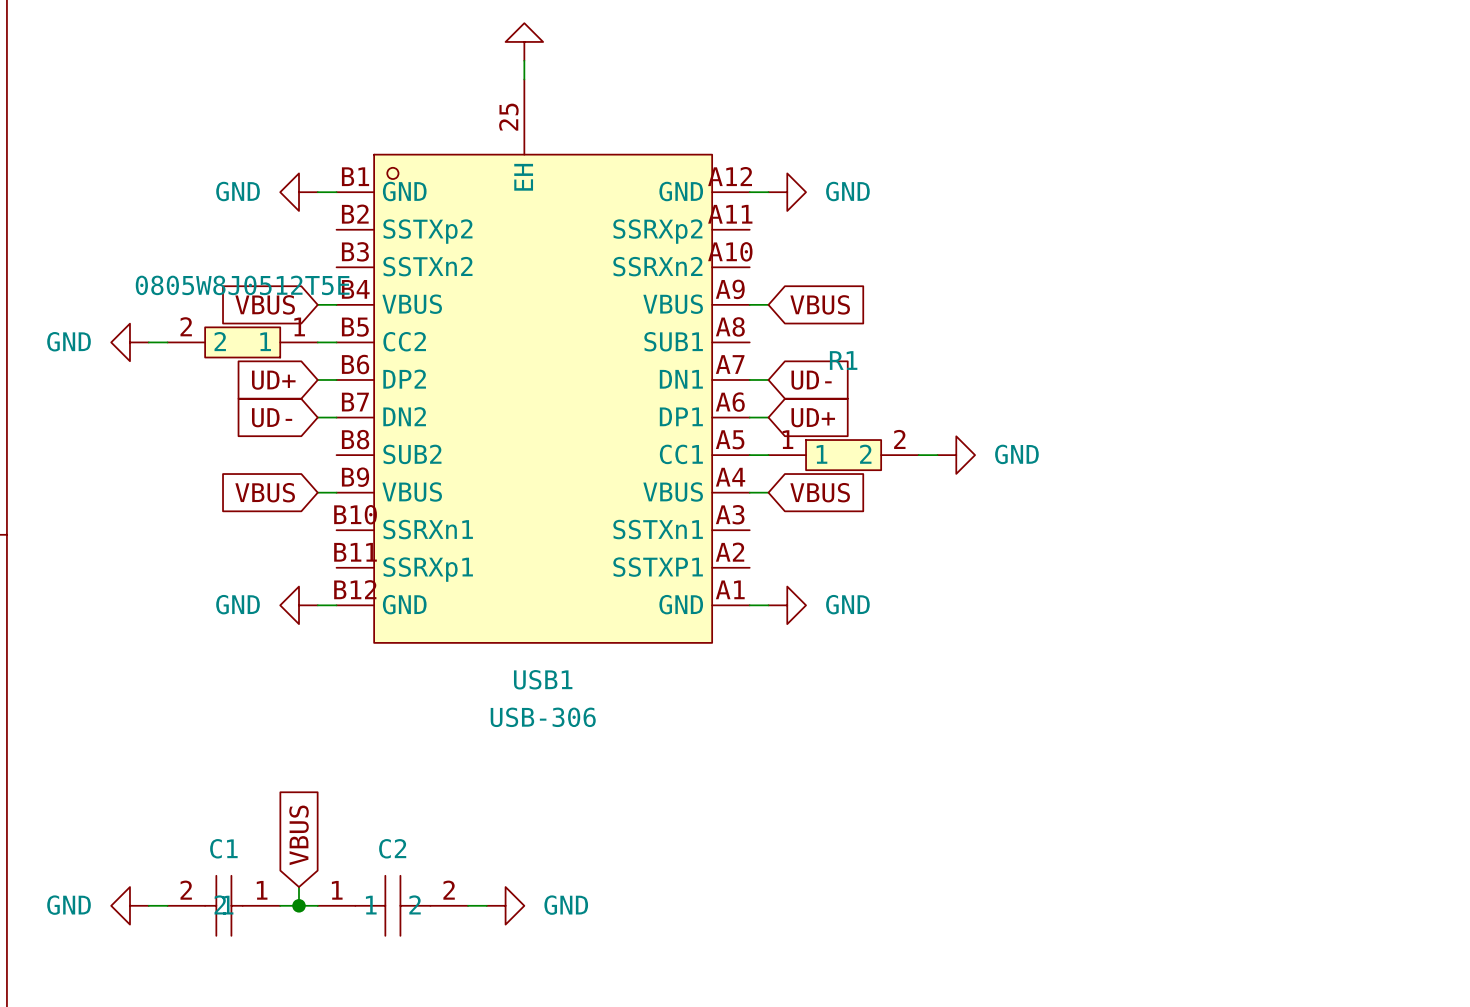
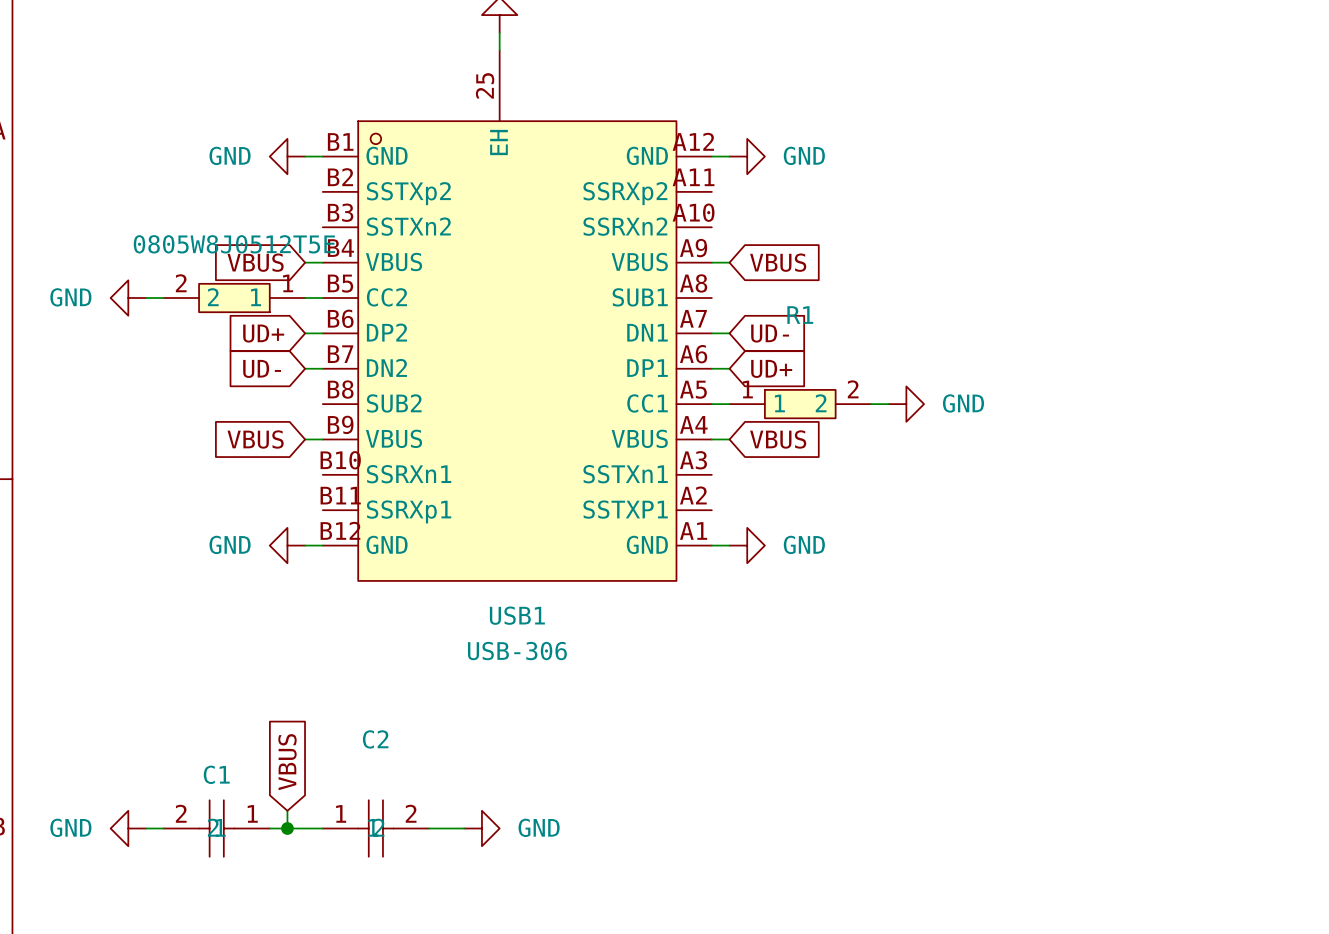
C2 name position: C2 (392, 848) -> C2 (375, 739)
C2 symbol: [317, 875, 469, 936] -> [322, 800, 429, 857]

